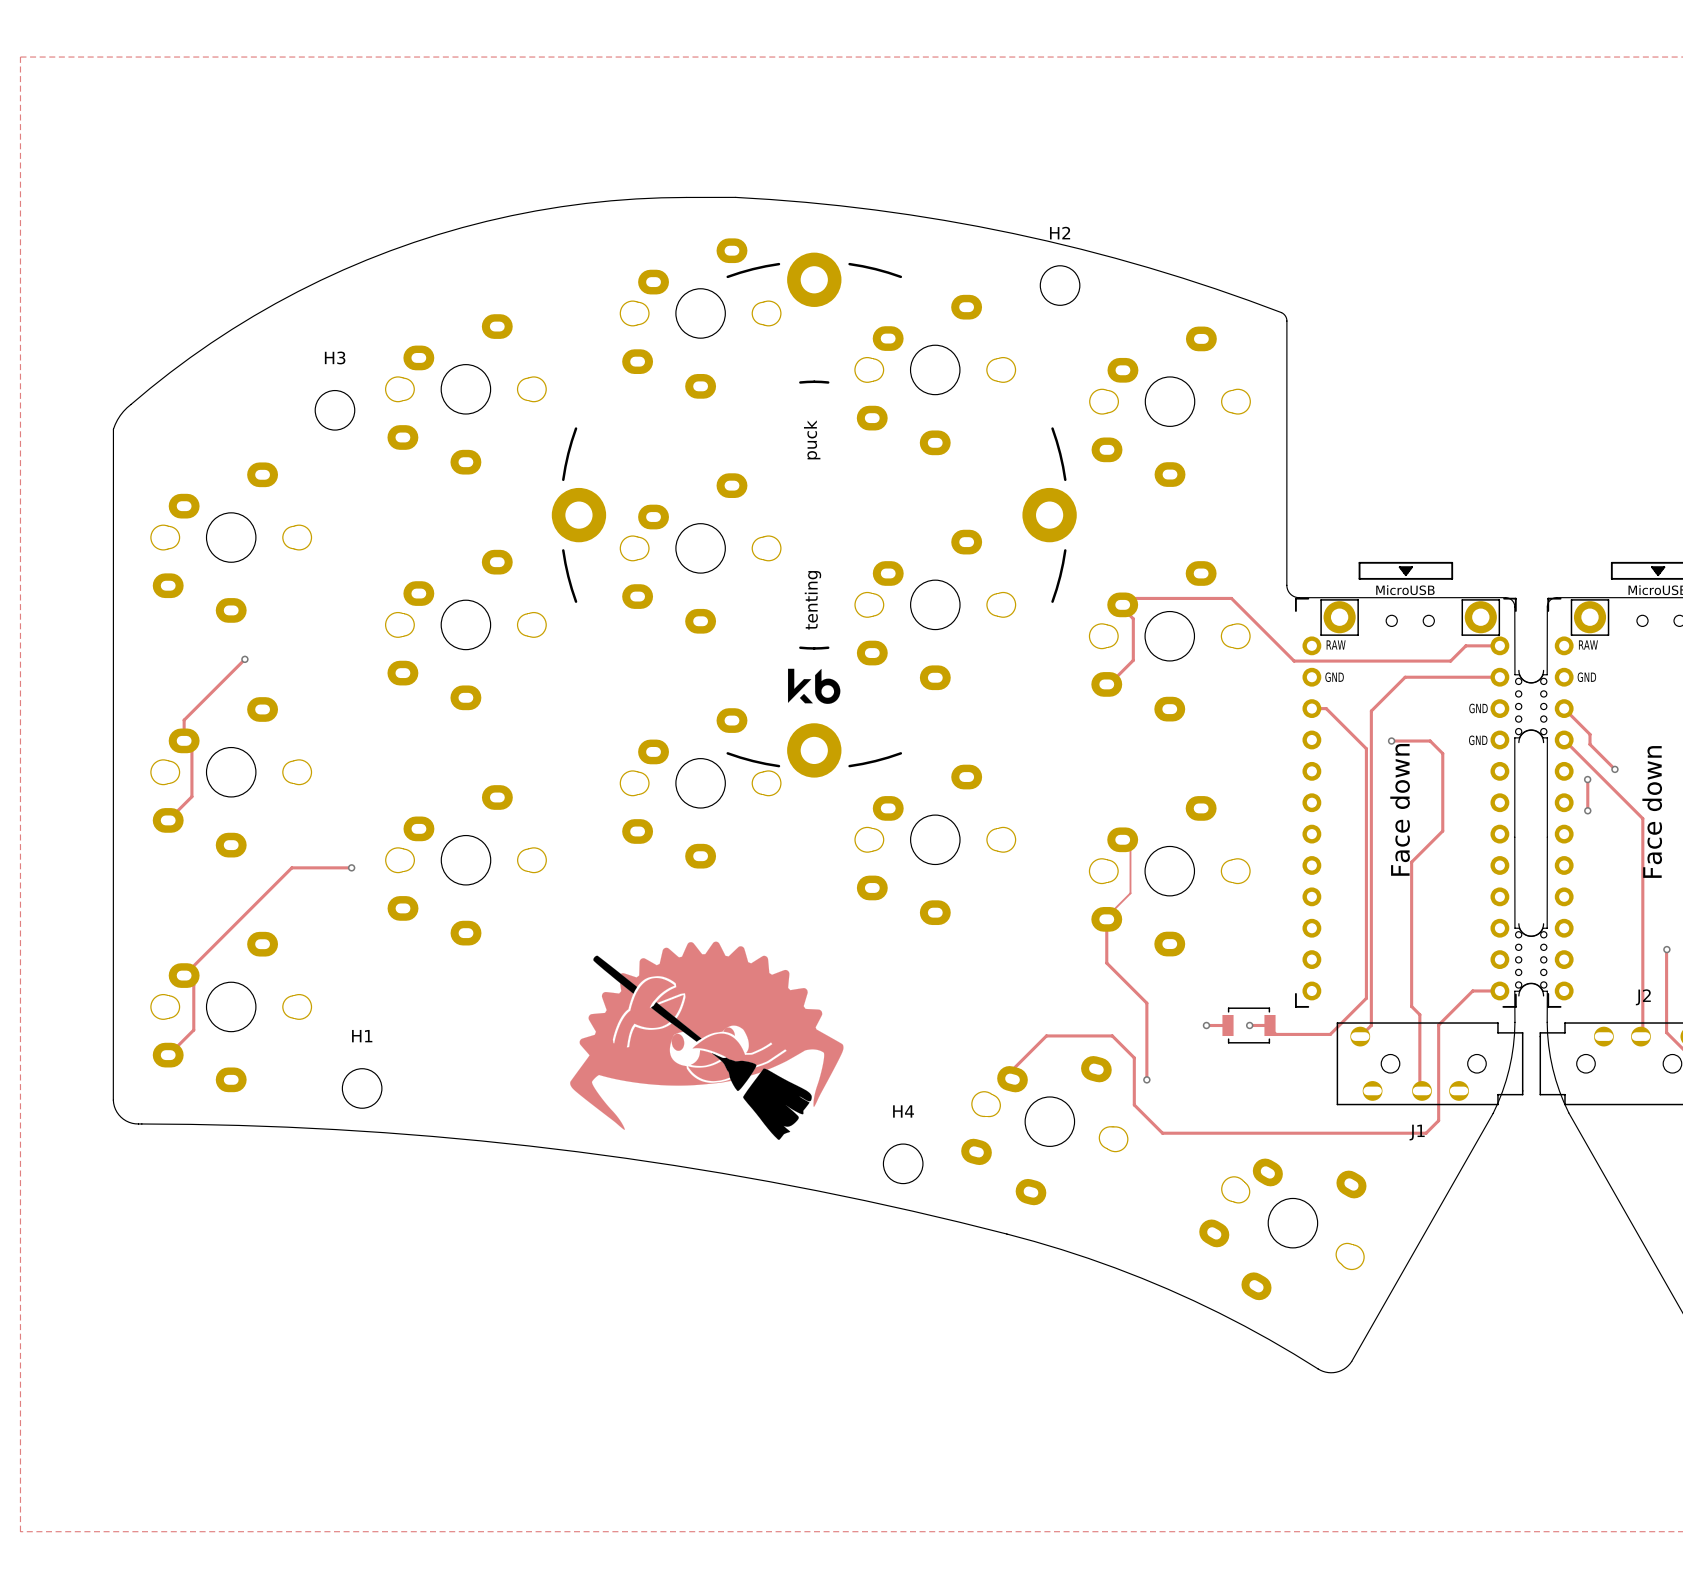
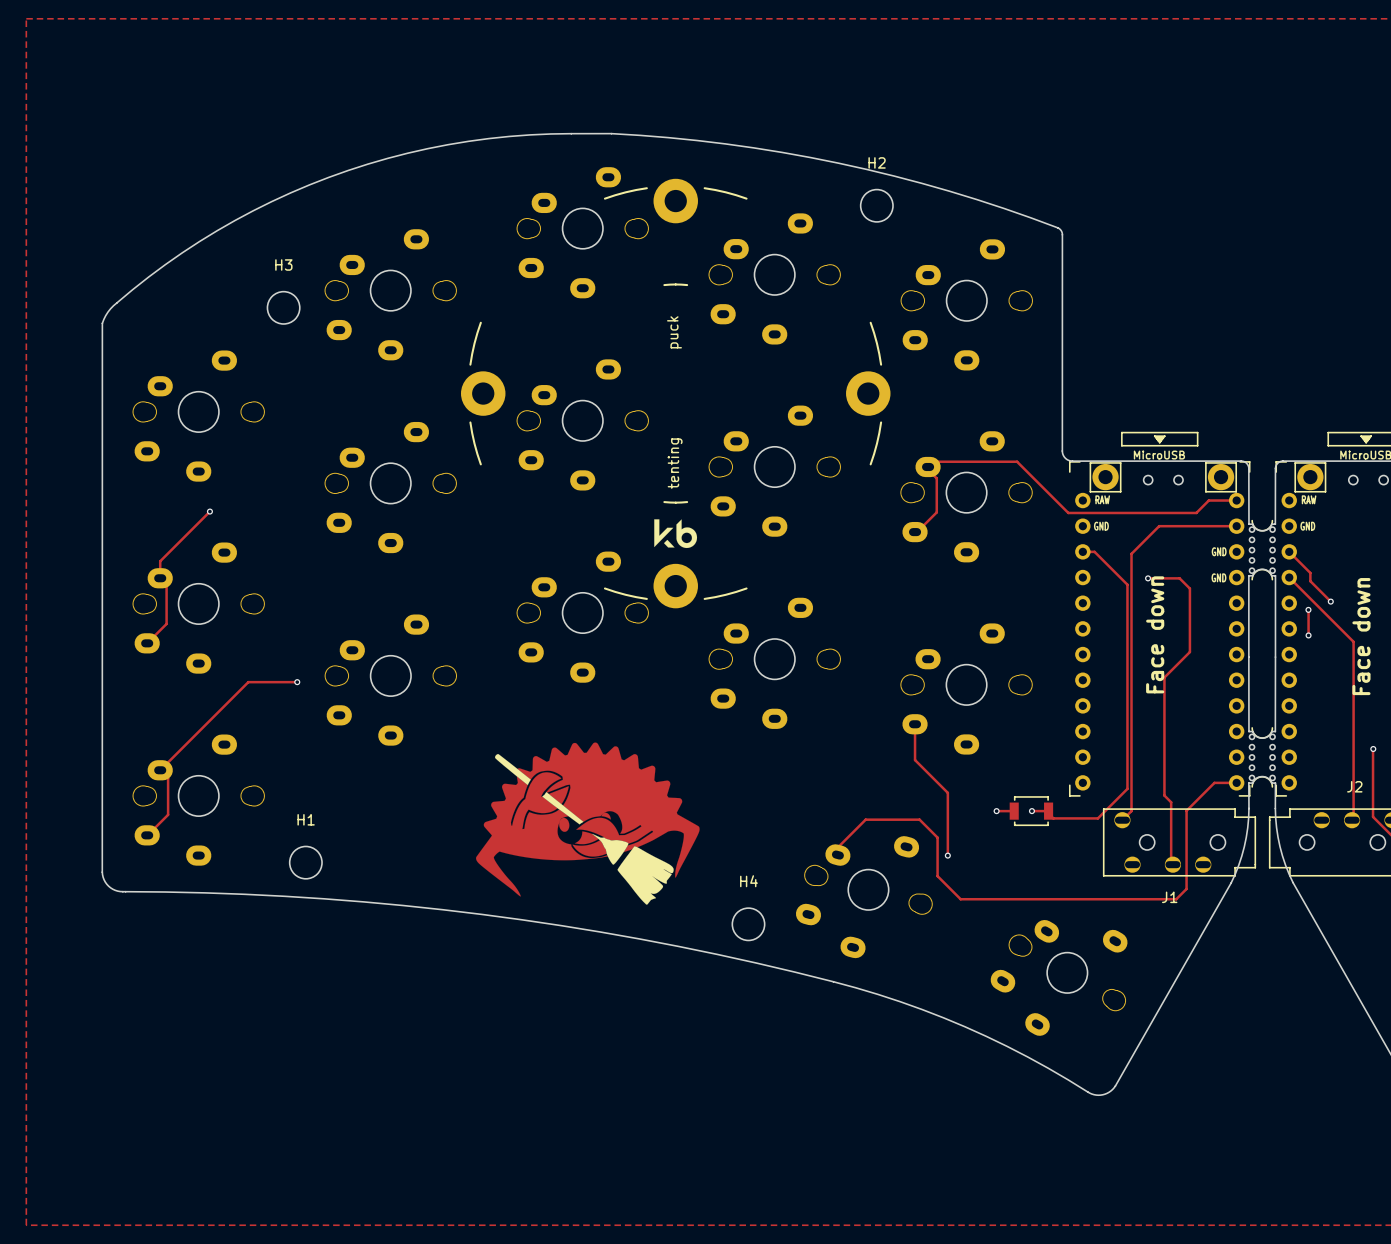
track: (1122, 839) (1130, 847) (1130, 893) (1106, 917) (1106, 919) -> none

